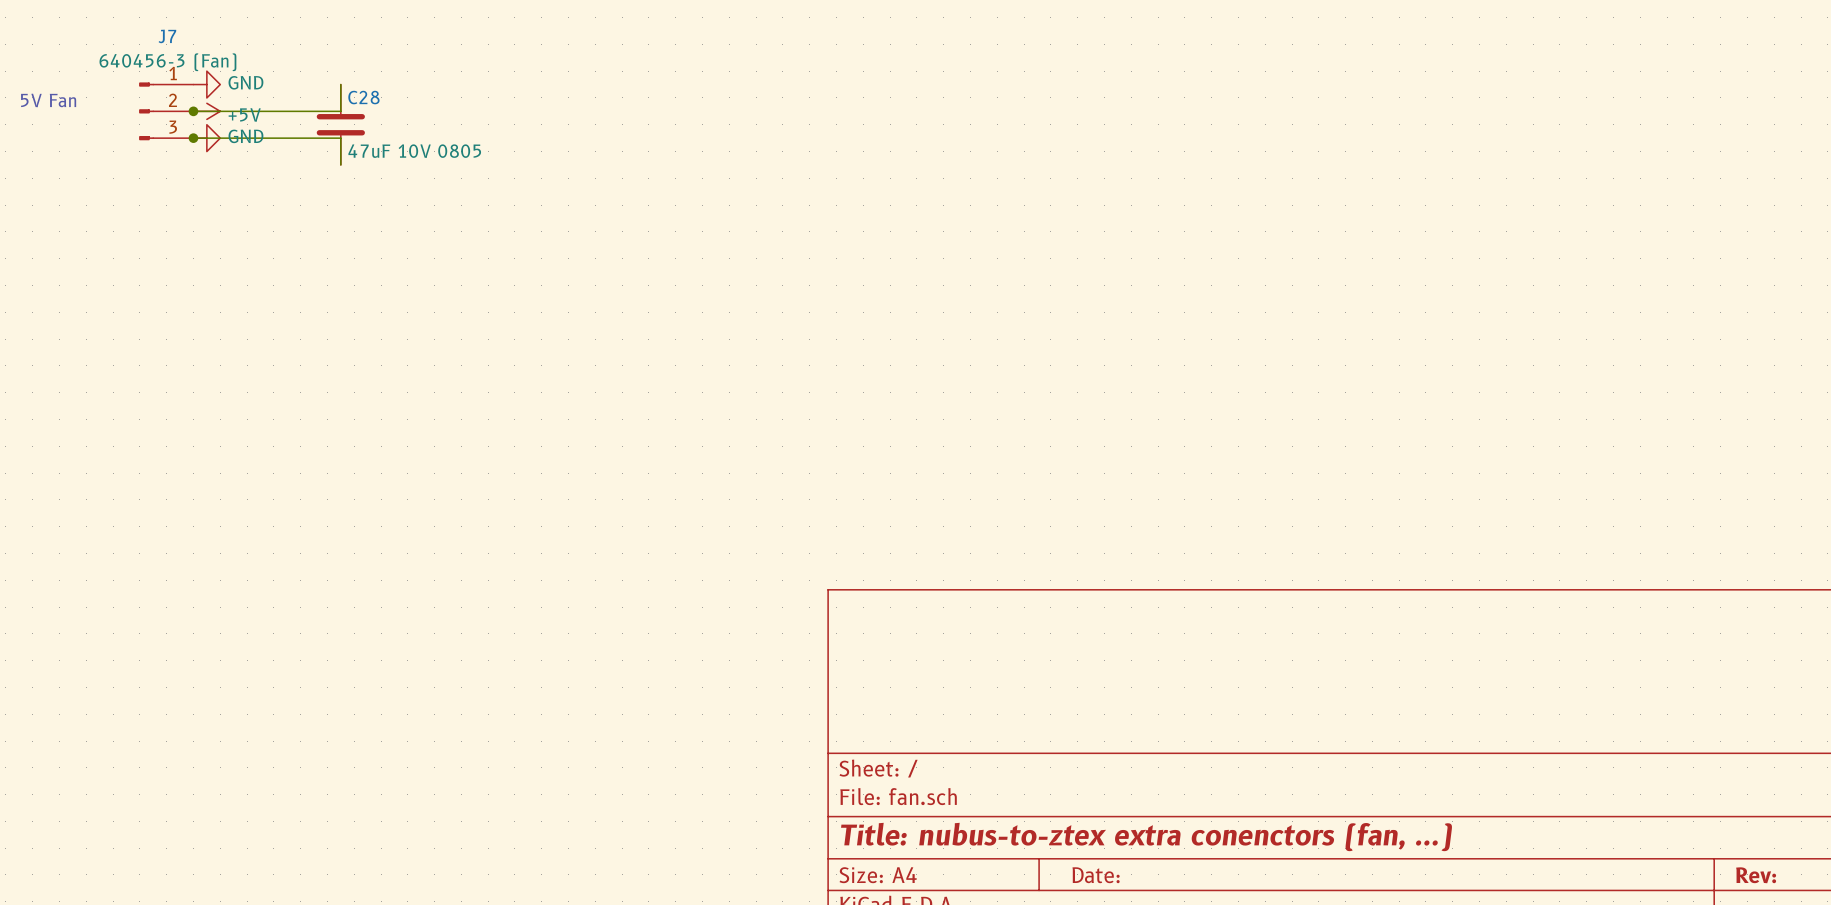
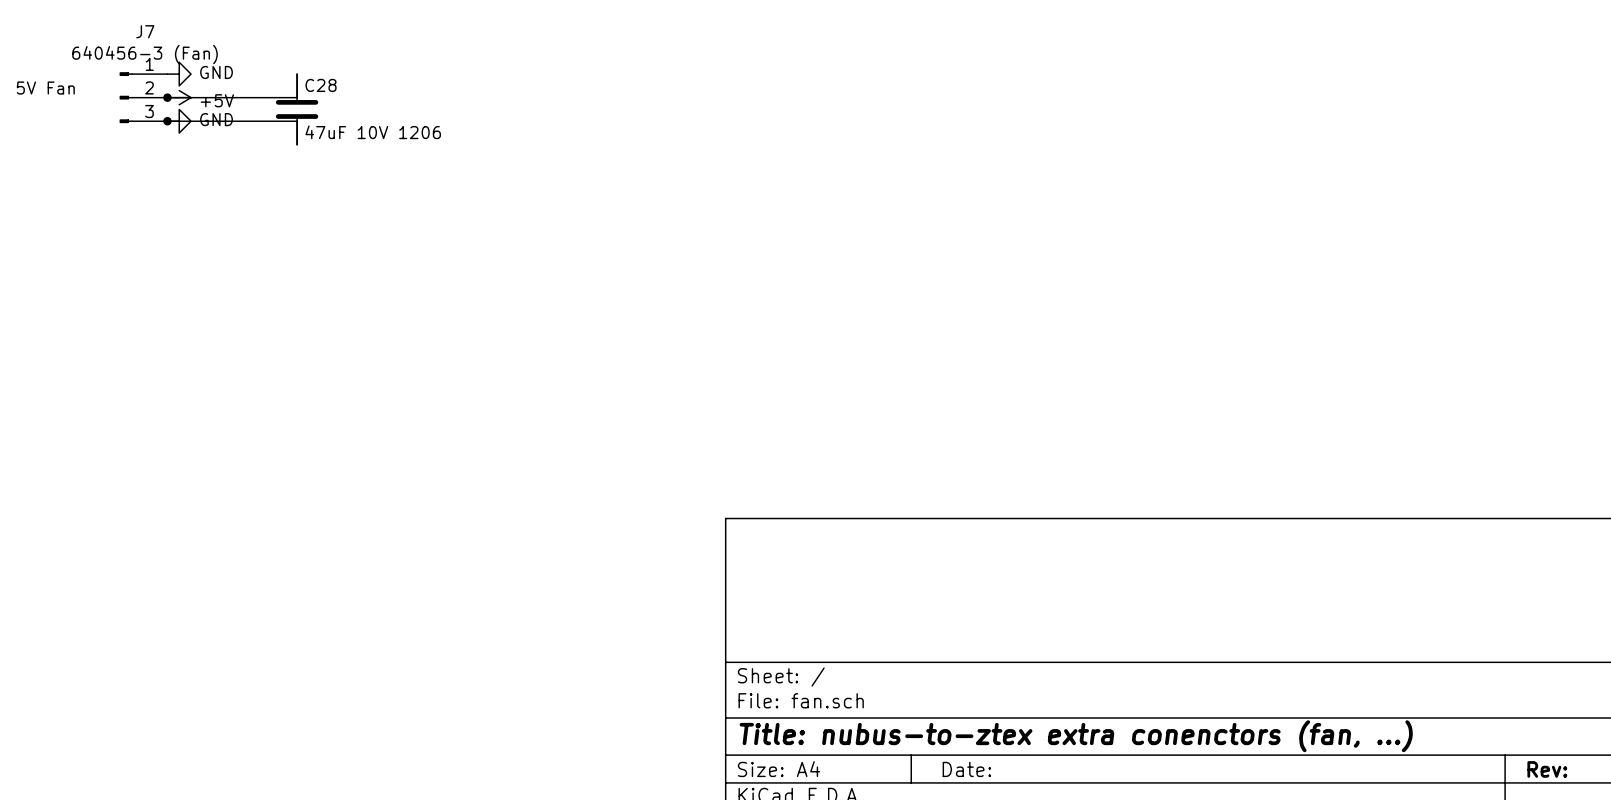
C28 value: 47uF 10V 0805 (414, 151) -> 47uF 10V 1206 (373, 132)

